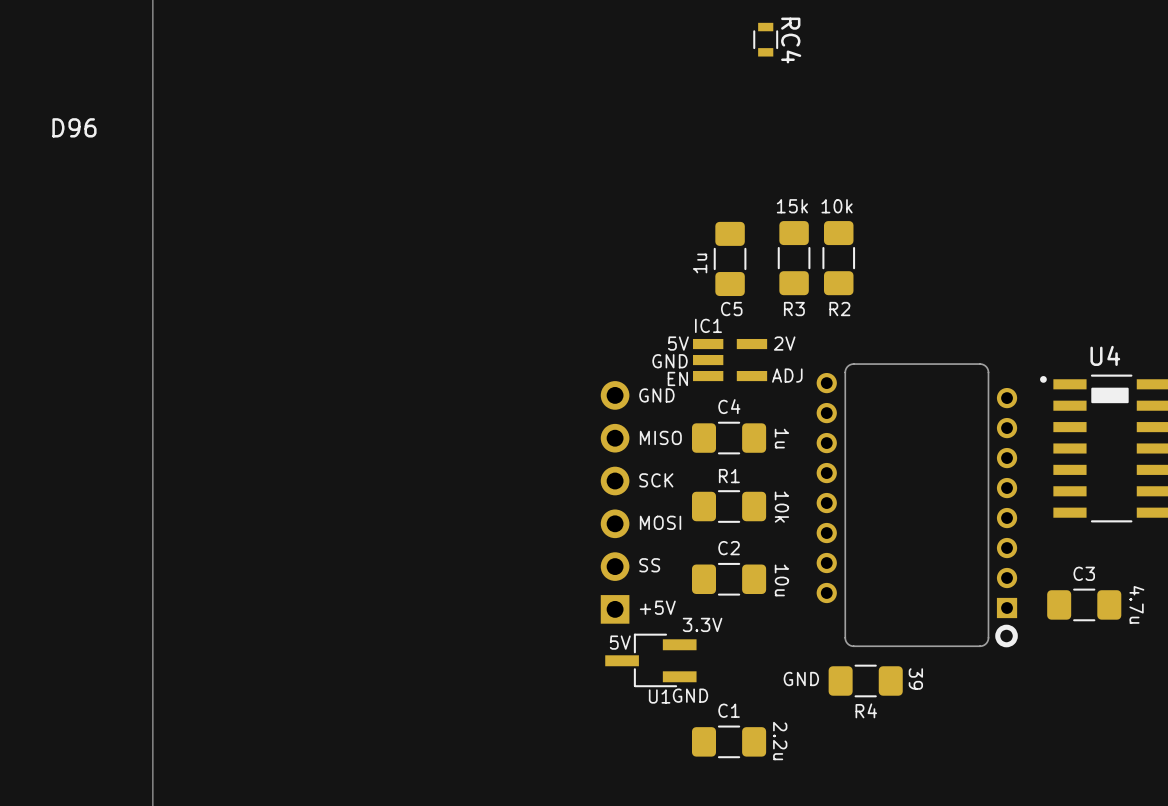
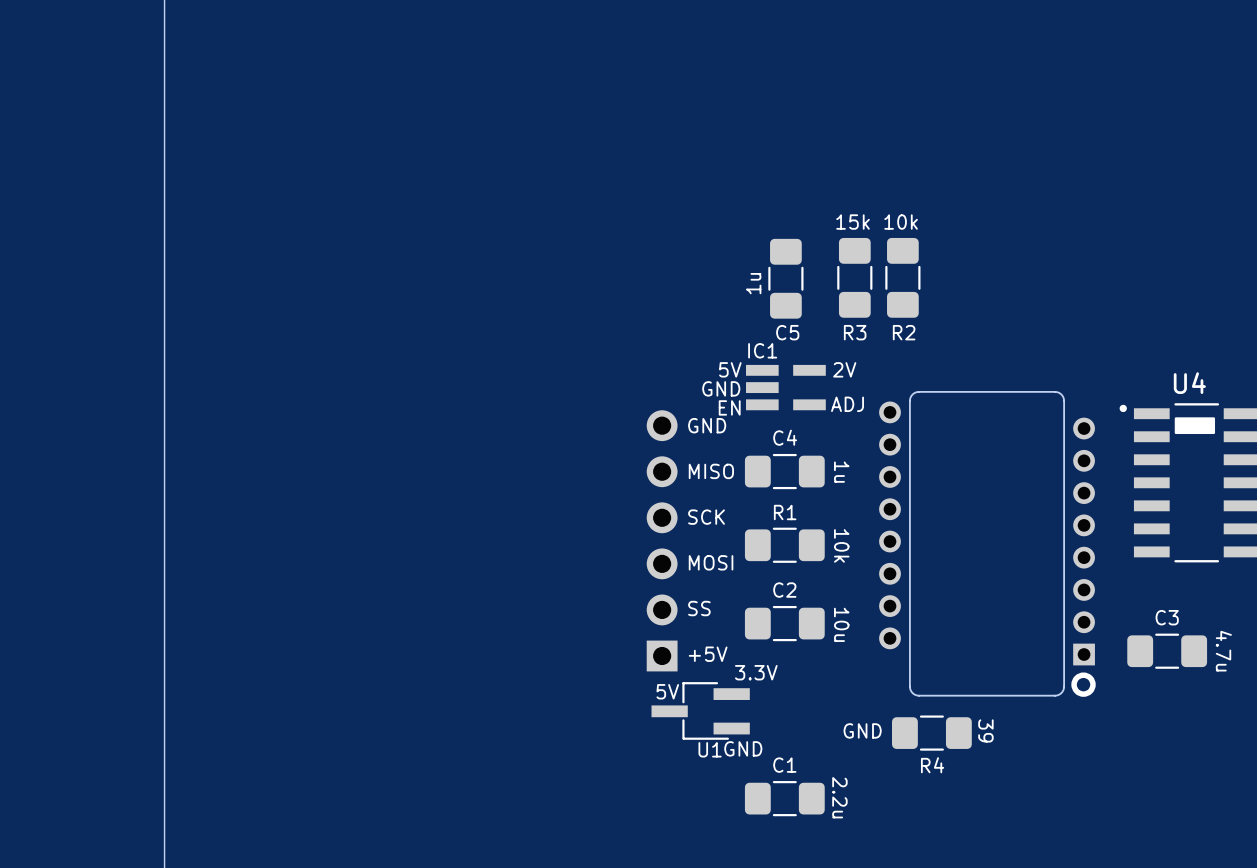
RC4: (765, 39) -> none
text: D96 (74, 127) -> none

